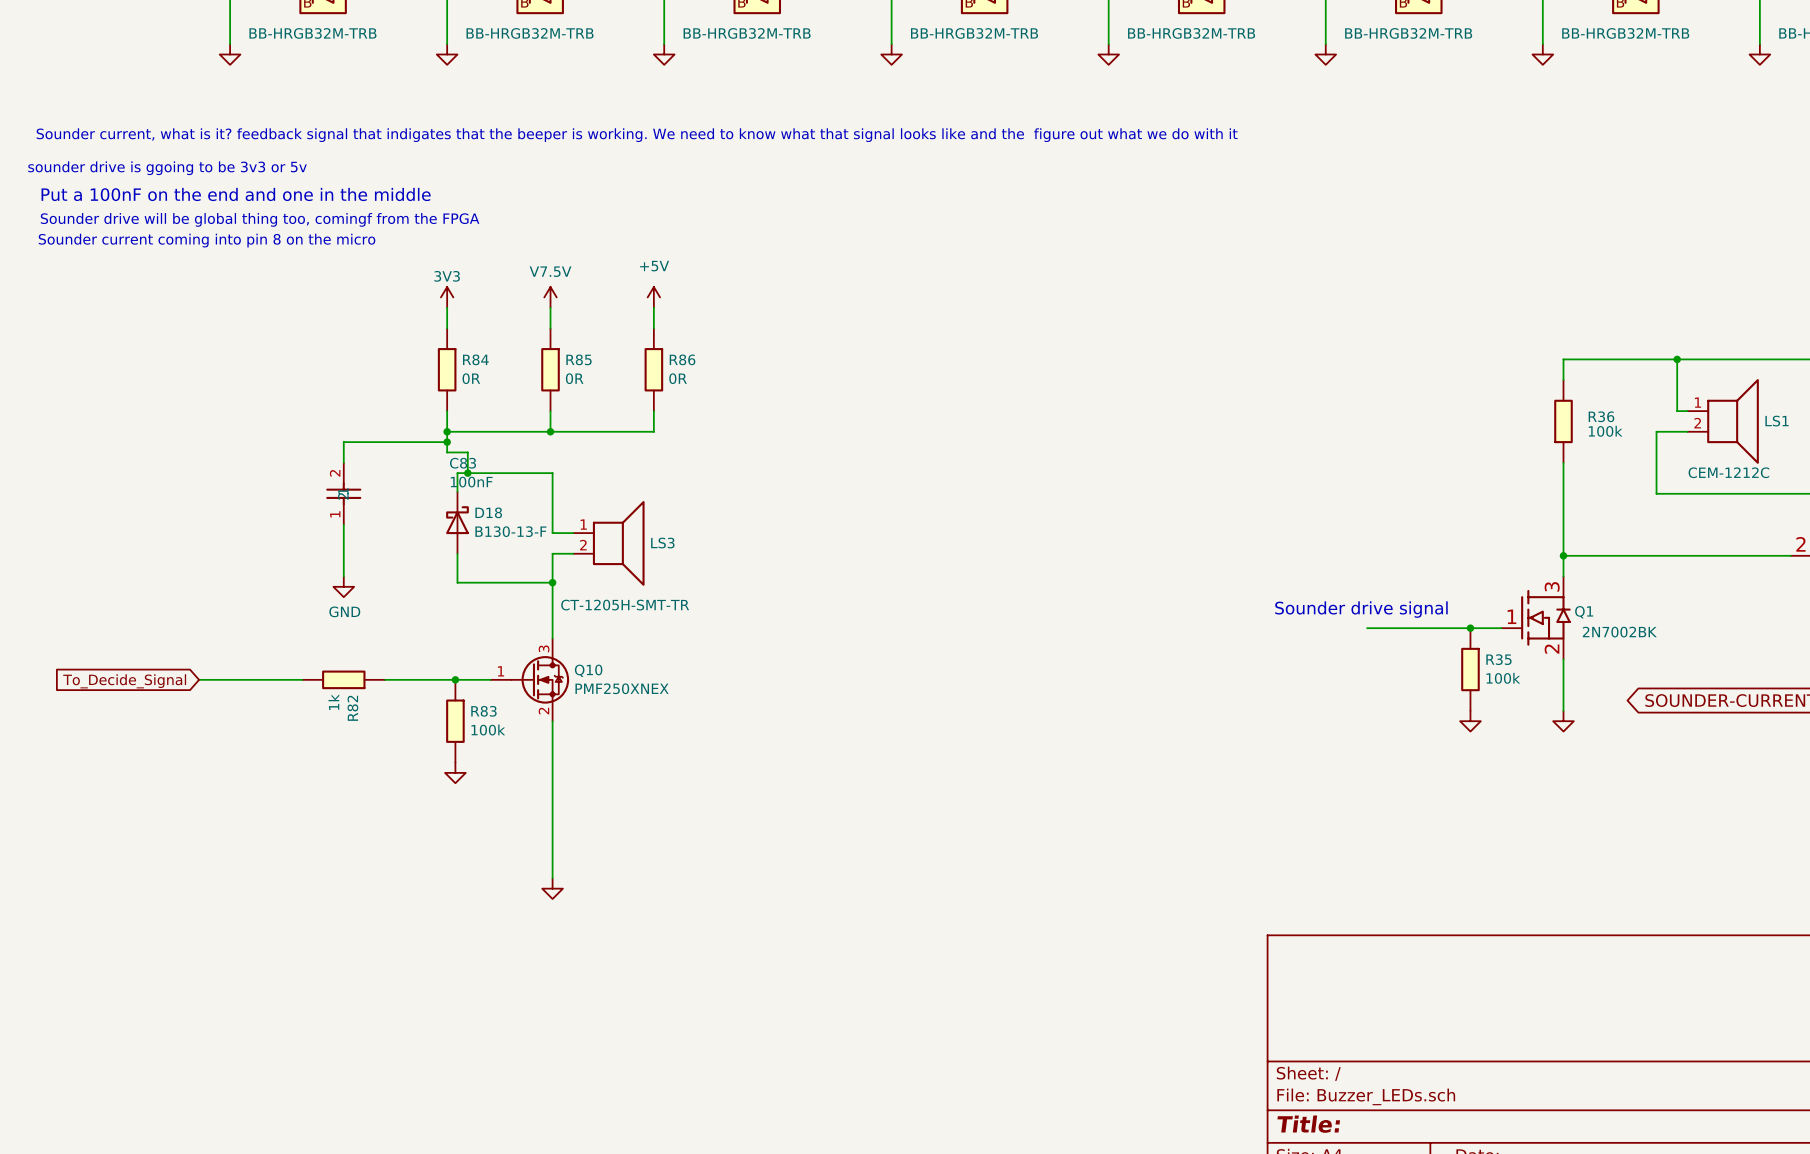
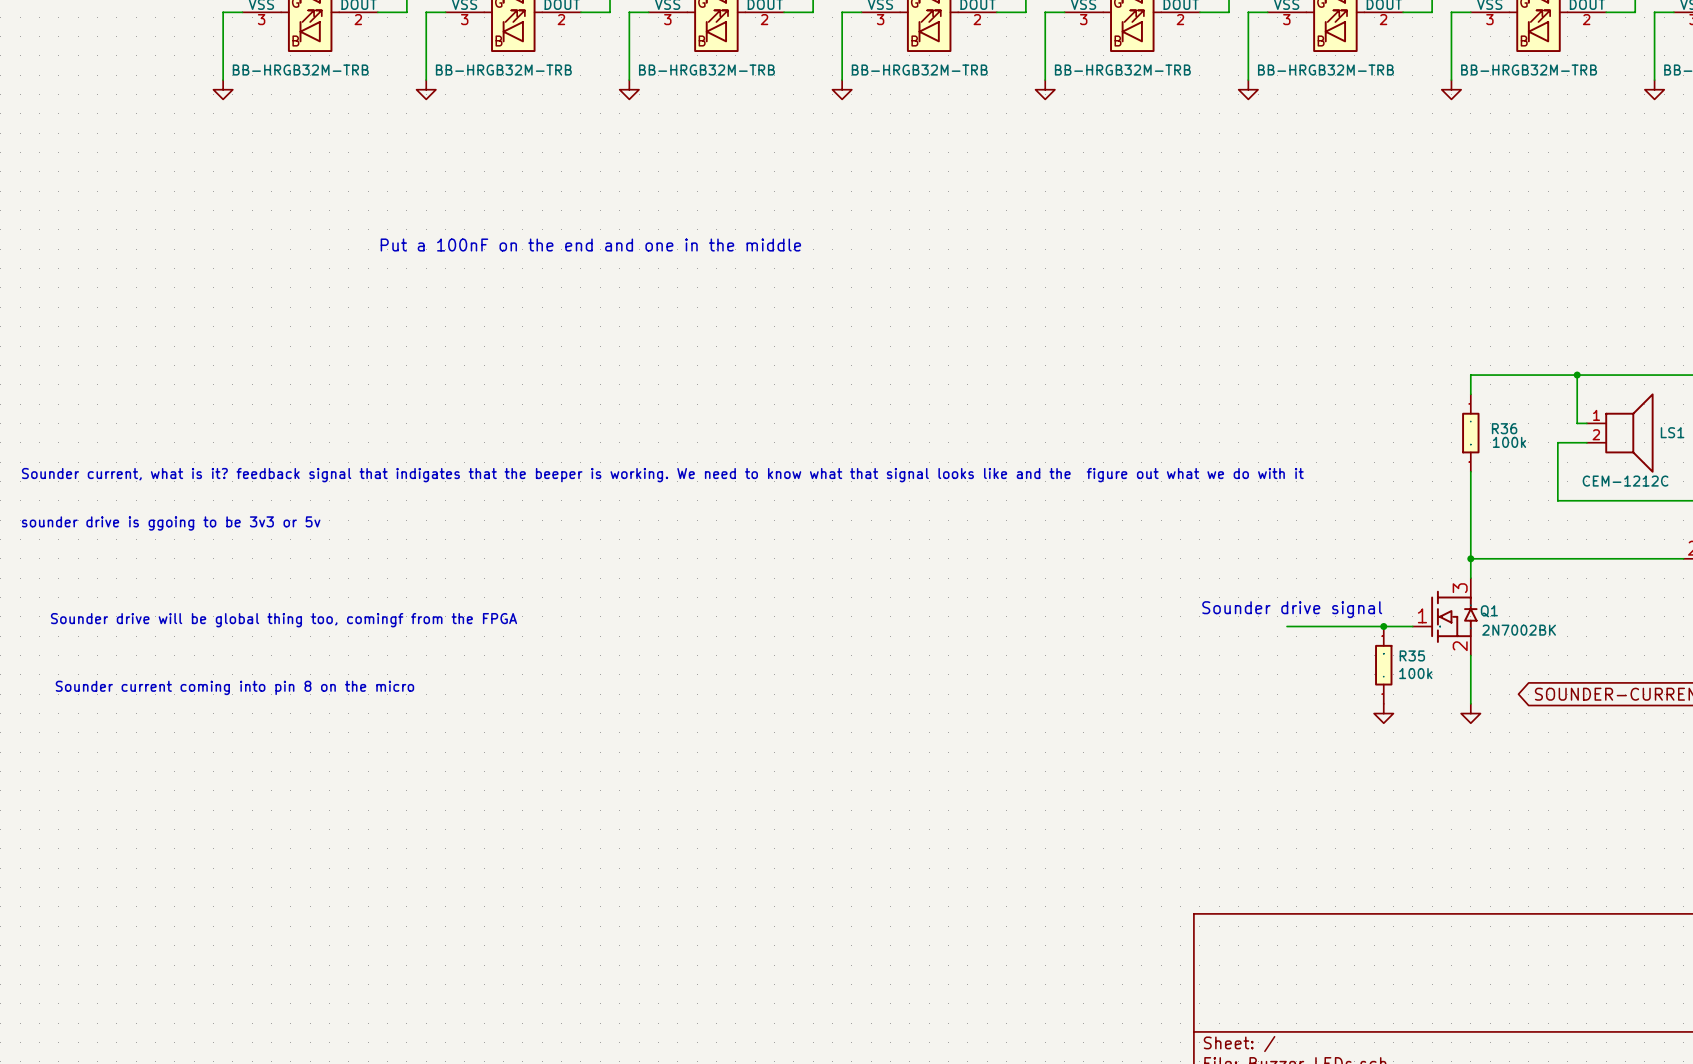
text: Sounder current, what is it? feedback signal that indigates that the beeper is working. We need to know what that signal looks like and the figure out what we do with it (637, 135) -> none
text: sounder drive is ggoing to be 3v3 or 5v (167, 168) -> none
text: Put a 100nF on the end and one in the middle (236, 194) -> none
text: Sounder drive will be global thing too, comingf from the FPGA (260, 219) -> none
text: none -> Put a 100nF on the end and one in the middle (590, 245)
text: Sounder current coming into pin 8 on the micro (207, 240) -> none
power symbol: 3V3 (447, 297) -> none
power symbol: V7.5V (550, 297) -> none
power symbol: +5V (653, 297) -> none
wire: (447, 307) (447, 328) -> none
wire: (550, 307) (550, 328) -> none
wire: (653, 307) (653, 328) -> none
R84: (447, 369) -> none
R85: (550, 369) -> none
R86: (653, 369) -> none
wire: (447, 411) (447, 452) (467, 452) (467, 473) -> none
wire: (550, 411) (550, 431) -> none
wire: (653, 411) (653, 431) (447, 431) -> none
junction: (447, 431) -> none
junction: (550, 431) -> none
wire: (447, 442) (343, 442) (343, 462) -> none
junction: (447, 442) -> none
text: none -> Sounder current, what is it? feedback signal that indigates that the beeper is working. We need to know what that signal looks like and the figure out what we do with it (662, 475)
junction: (467, 473) -> none
wire: (457, 491) (457, 473) (552, 473) (552, 533) (573, 533) -> none
C83: (343, 493) -> none
text: none -> sounder drive is ggoing to be 3v3 or 5v (171, 523)
D18: B130-13-F (457, 522) -> none
wire: (343, 524) (343, 576) -> none
LS3: (608, 543) -> none
wire: (457, 553) (457, 582) (552, 582) -> none
wire: (573, 553) (552, 553) (552, 638) -> none
junction: (552, 582) -> none
power symbol: GND (343, 586) -> none
text: none -> Sounder drive will be global thing too, comingf from the FPGA (283, 620)
wire: (199, 679) (302, 679) -> none
R82: (343, 679) -> none
wire: (385, 679) (490, 679) -> none
junction: (455, 679) -> none
Q10: PMF250XNEX (529, 679) -> none
global label: To_Decide_Signal (124, 681) -> none
text: none -> Sounder current coming into pin 8 on the micro (234, 687)
R83: (455, 721) -> none
wire: (552, 721) (552, 878) -> none
power symbol: (455, 772) -> none
power symbol: (552, 888) -> none

